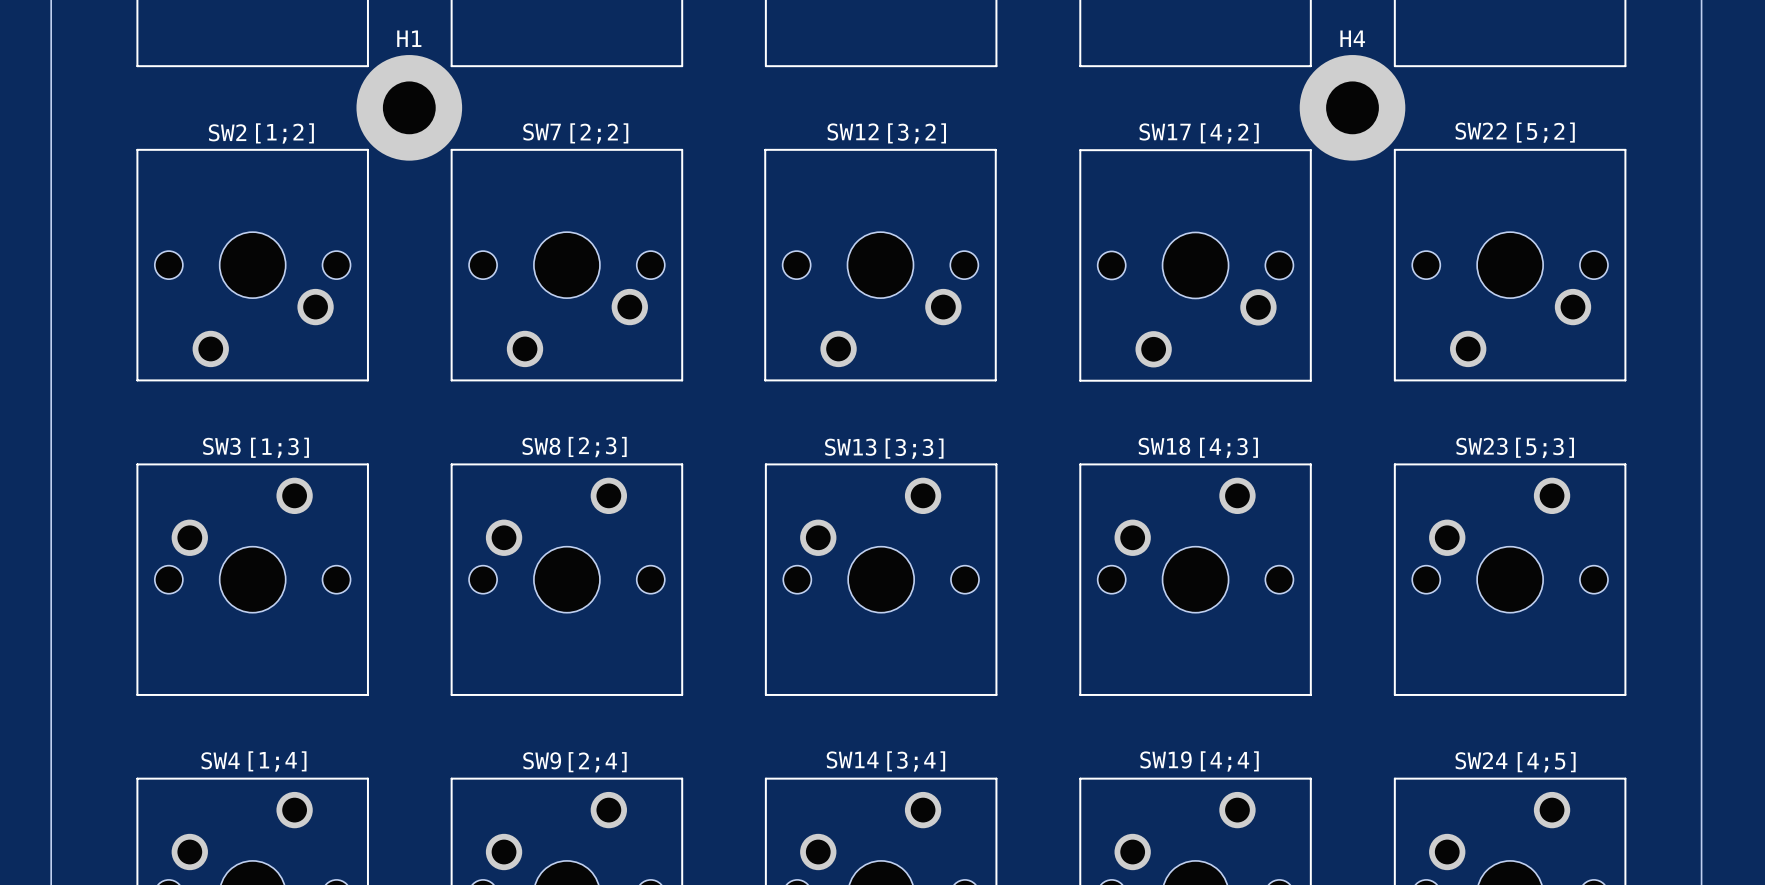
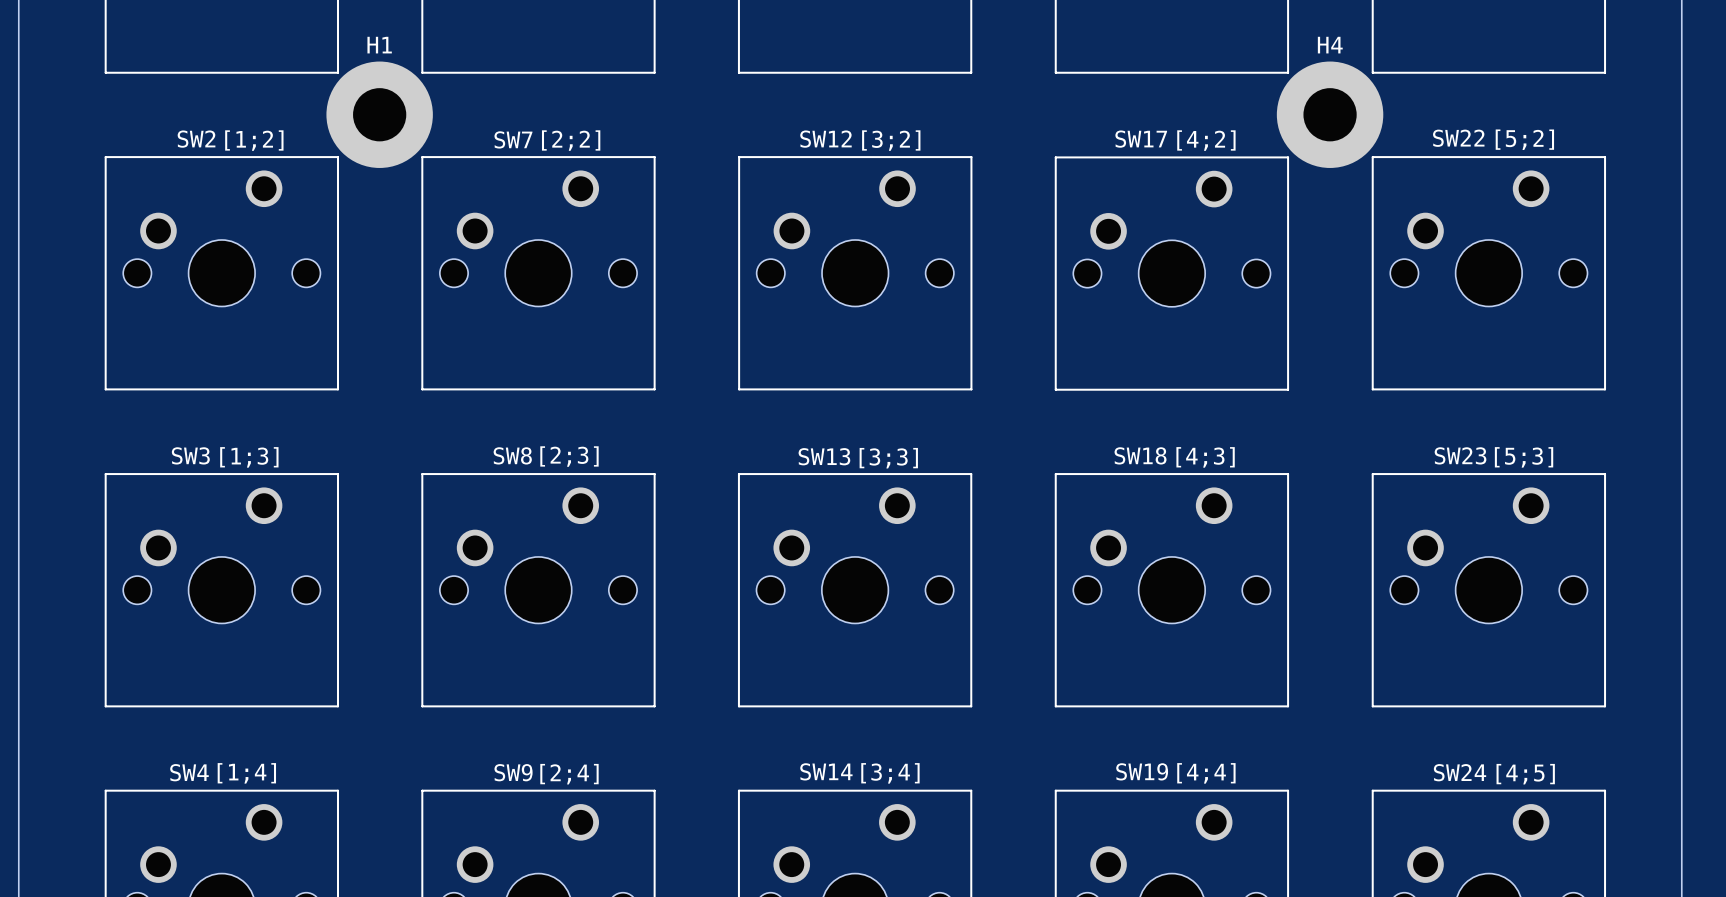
SW2 rotation: 0° (252, 265) -> 180° (221, 273)
SW7 rotation: 0° (566, 265) -> 180° (538, 273)
SW12 rotation: 0° (880, 265) -> 180° (855, 273)
SW17 rotation: 0° (1195, 265) -> 180° (1171, 273)
SW22 rotation: 0° (1510, 265) -> 180° (1488, 273)

